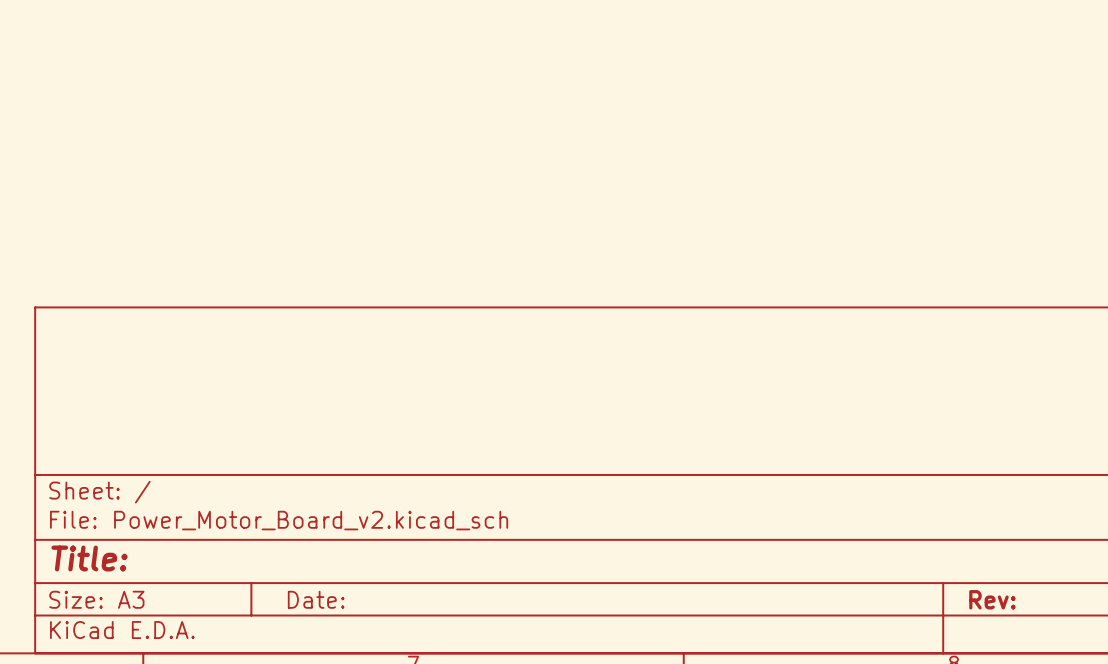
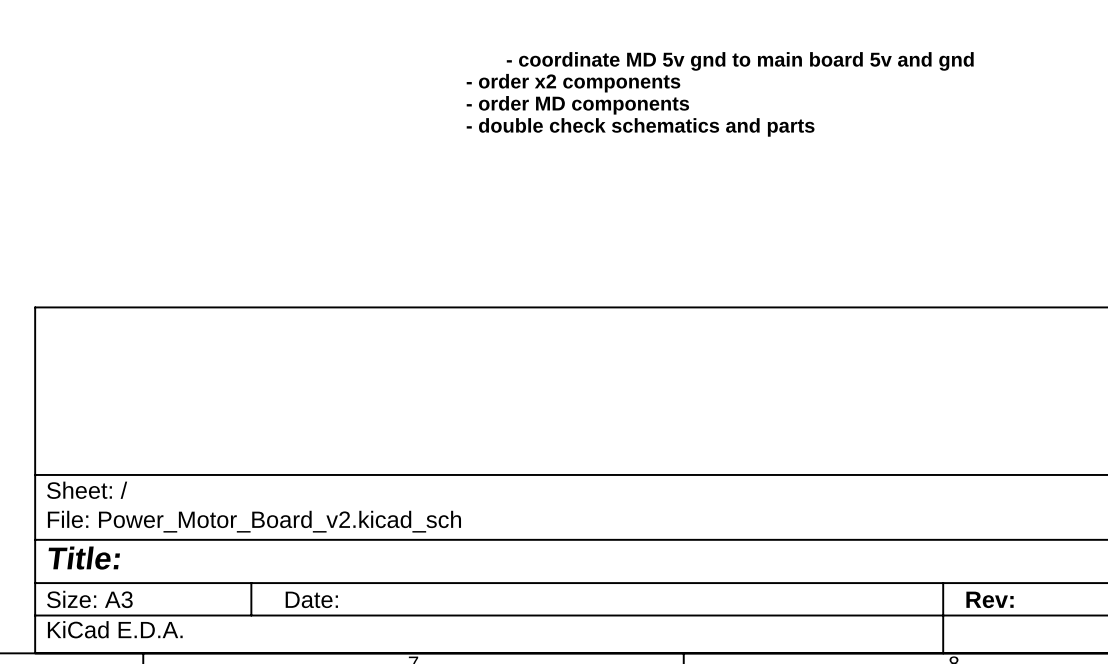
text: none -> - coordinate MD 5v gnd to main board 5v and gnd (740, 61)
text: none -> - order x2 components (573, 83)
text: none -> - order MD components (577, 105)
text: none -> - double check schematics and parts (640, 127)

